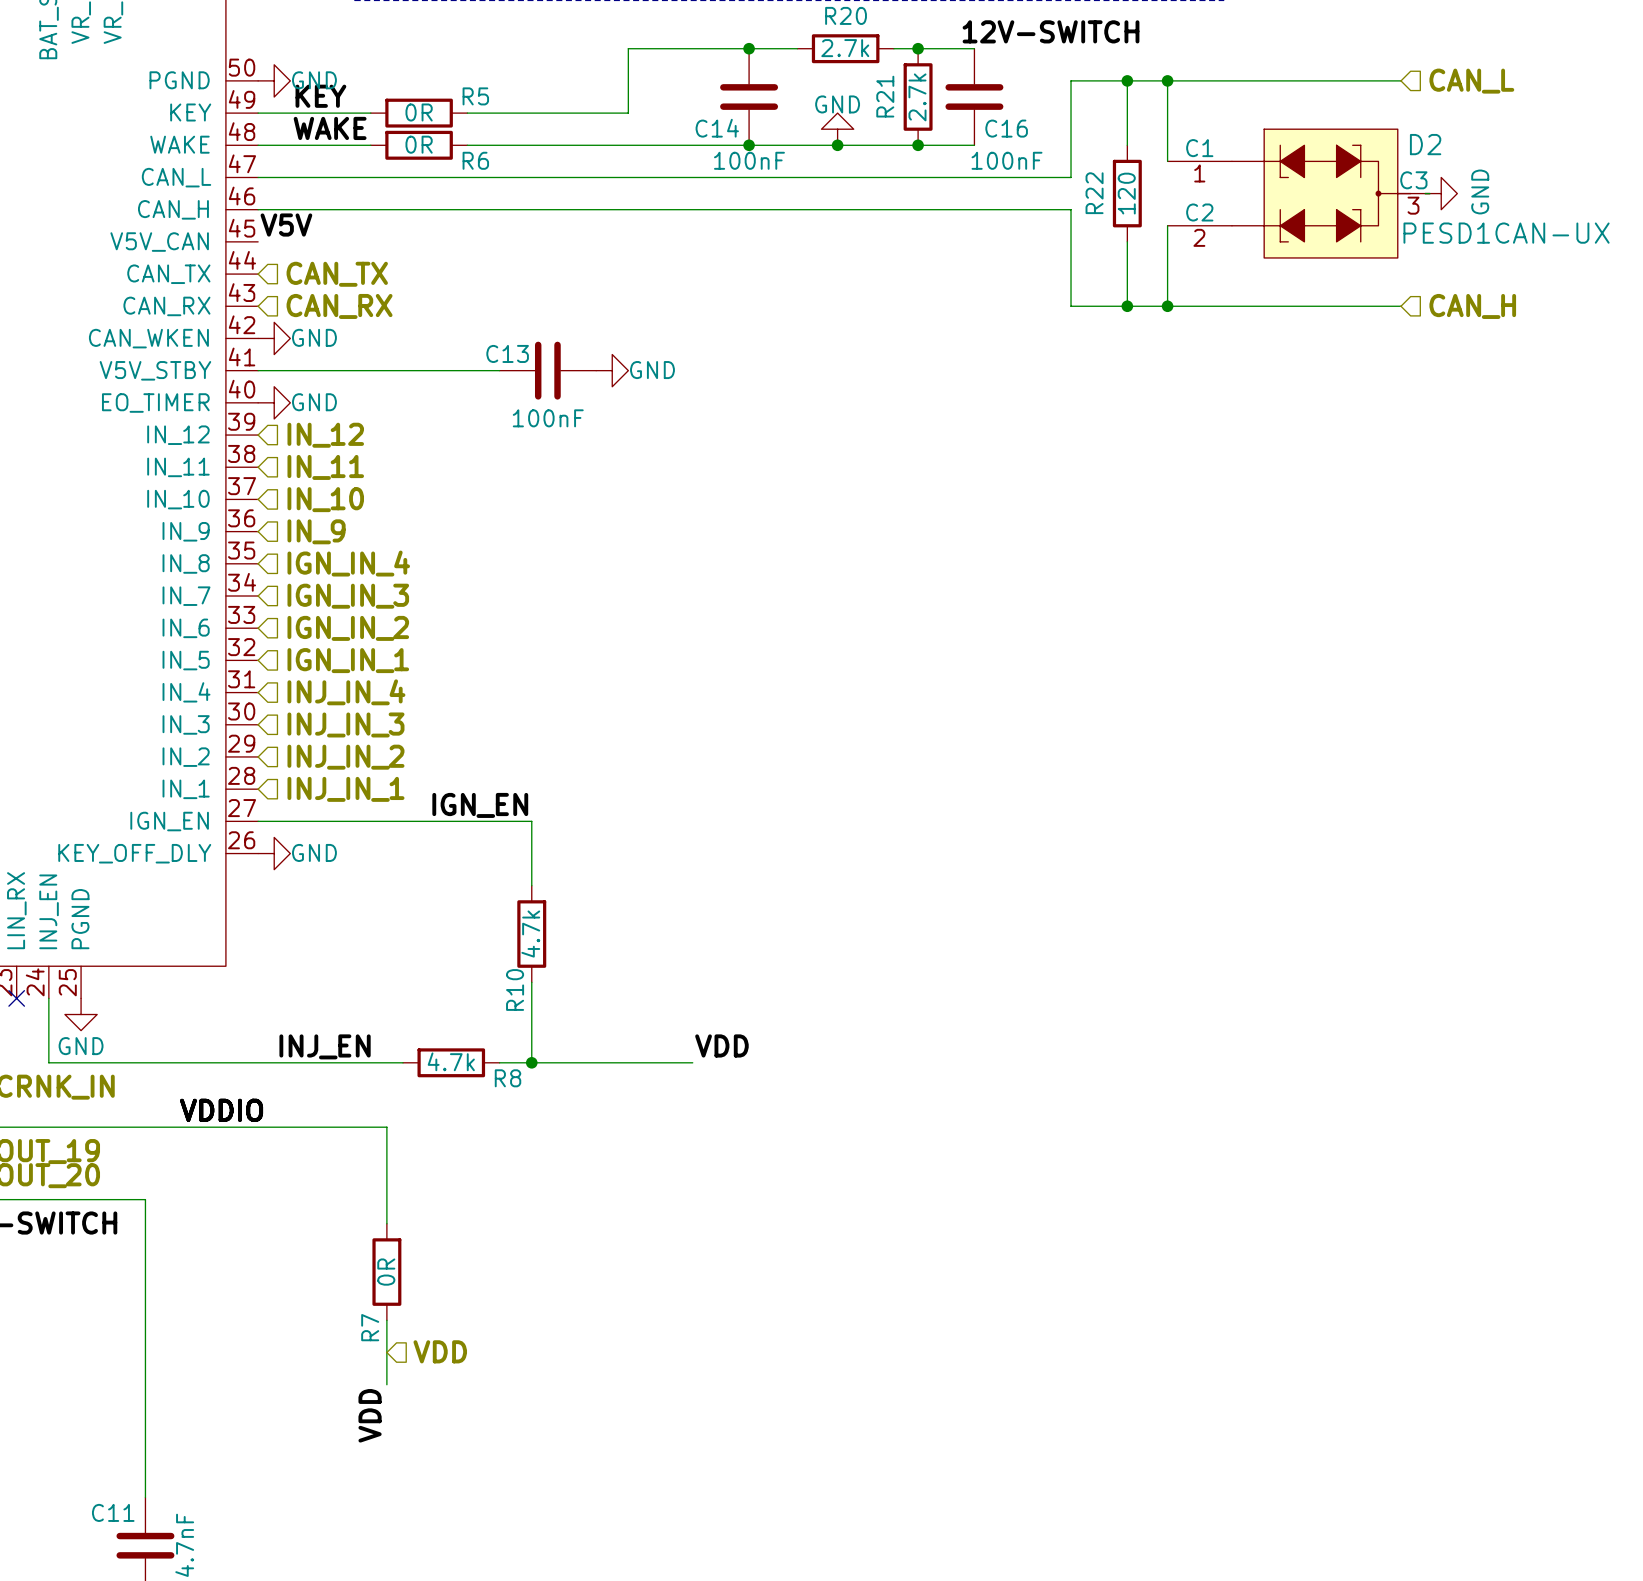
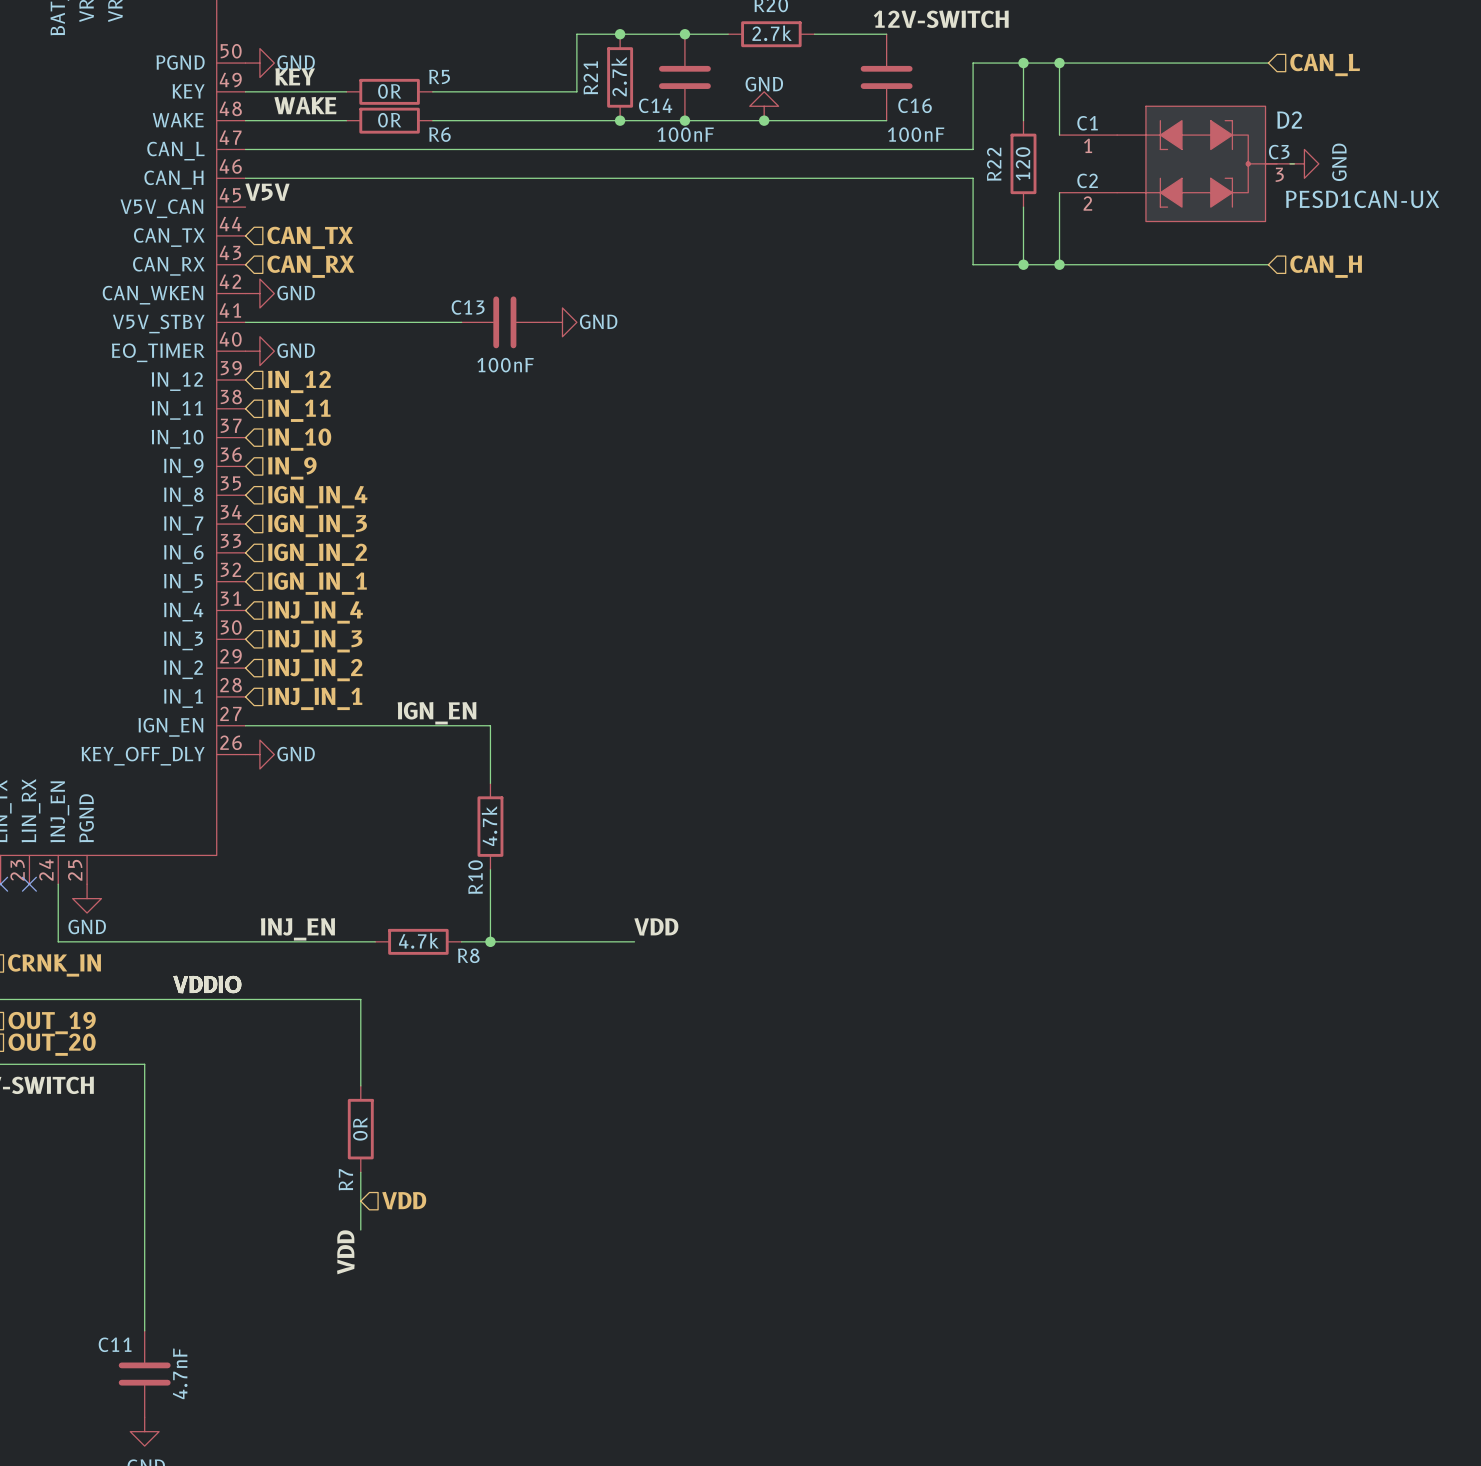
junction: none -> (620, 34)
junction: (918, 48) -> none
R21 position: (918, 97) -> (620, 77)
junction: none -> (620, 120)
junction: (918, 145) -> none

